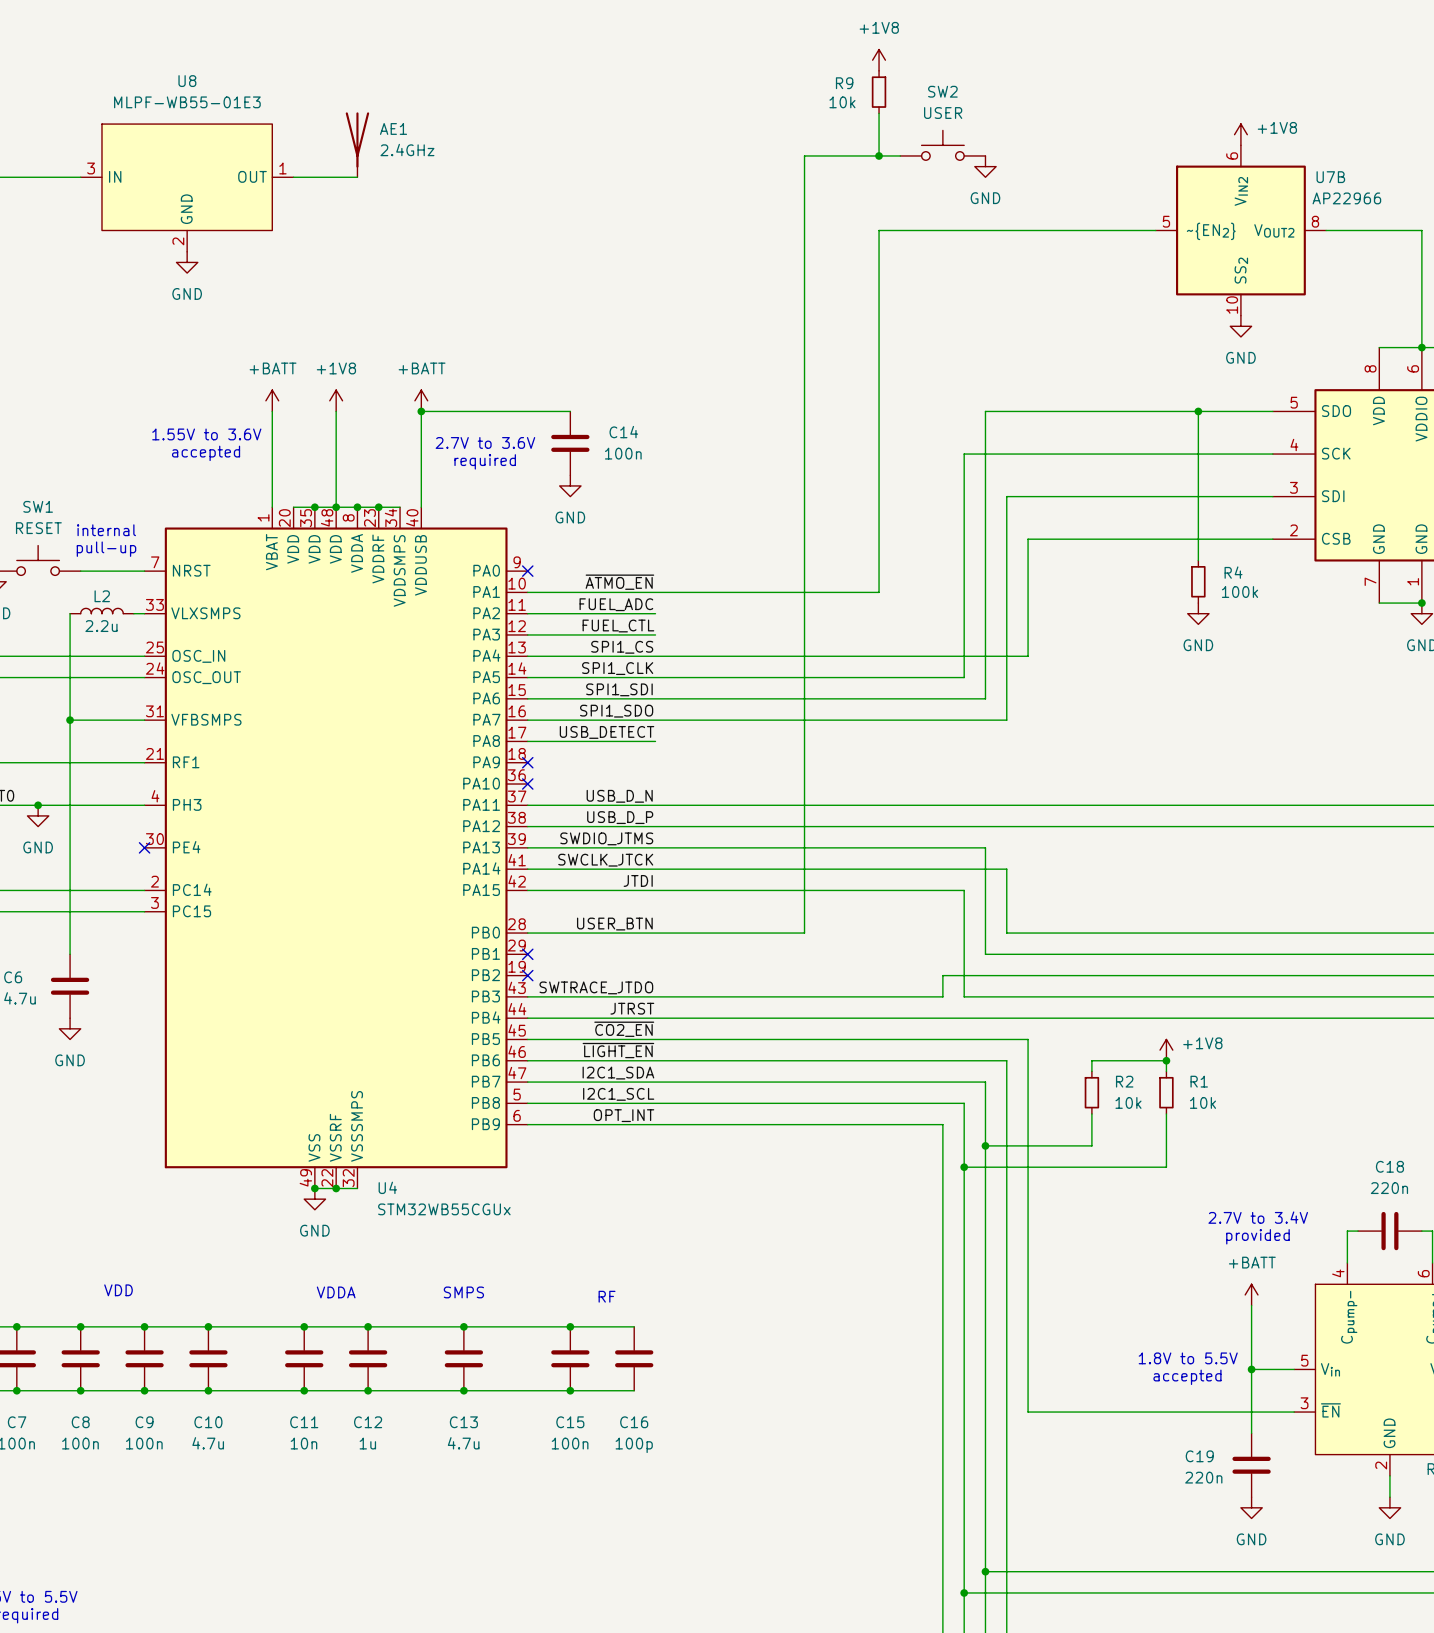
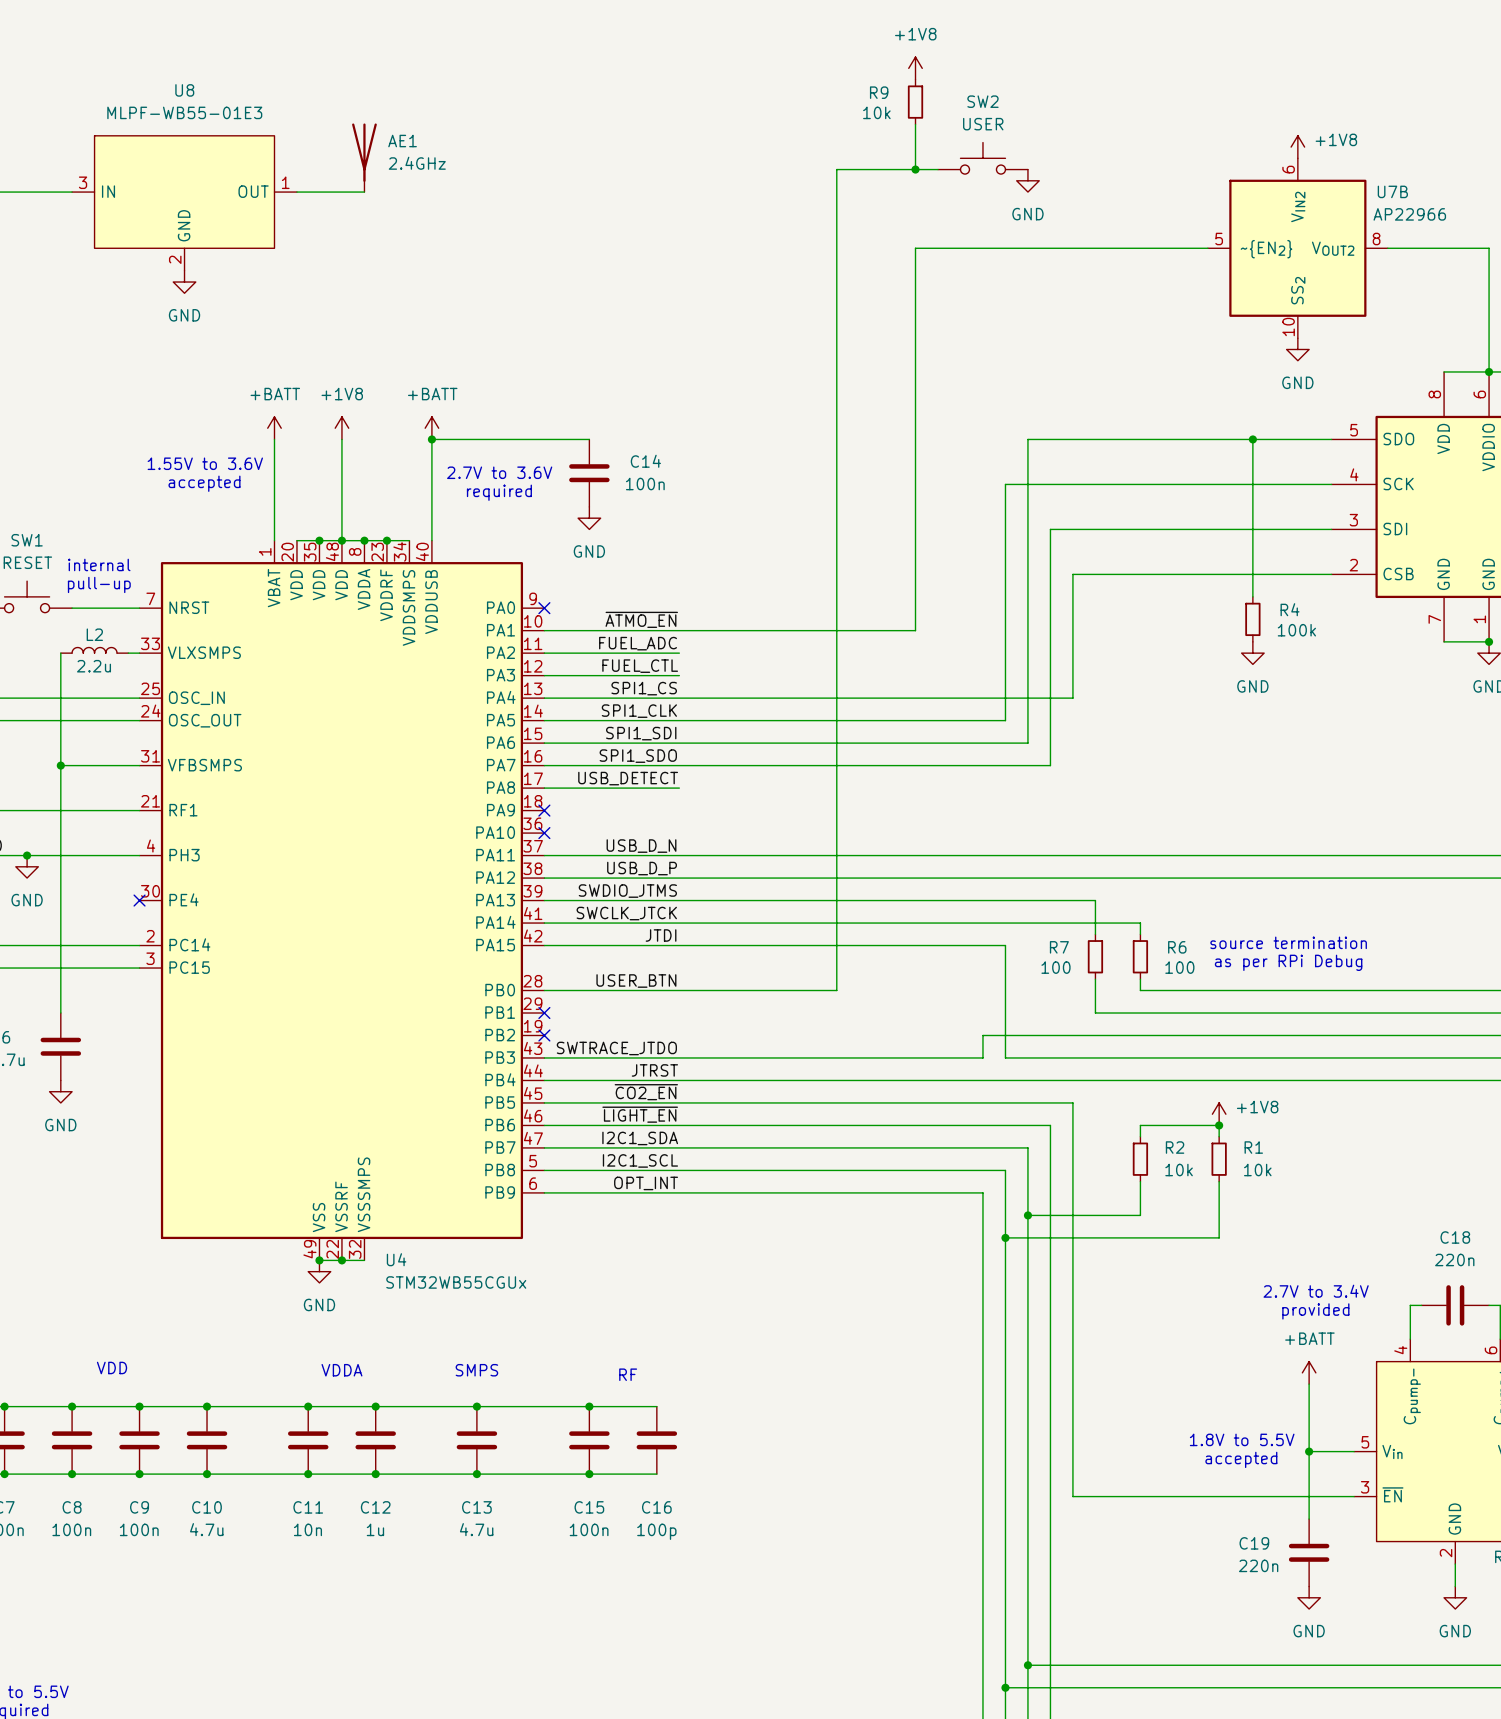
wire: (985, 847) (985, 954) (1049, 954) -> (1027, 900) (1095, 900) (1095, 934)
wire: (1006, 869) (1006, 933) (1091, 933) -> (1050, 923) (1140, 923) (1140, 934)
text: none -> source termination (1288, 942)
R7: none -> 100 (1095, 956)
R6: none -> 100 (1140, 956)
text: none -> as per RPi Debug (1288, 962)
wire: none -> (1095, 979) (1095, 1013)
wire: none -> (1140, 979) (1140, 990)

